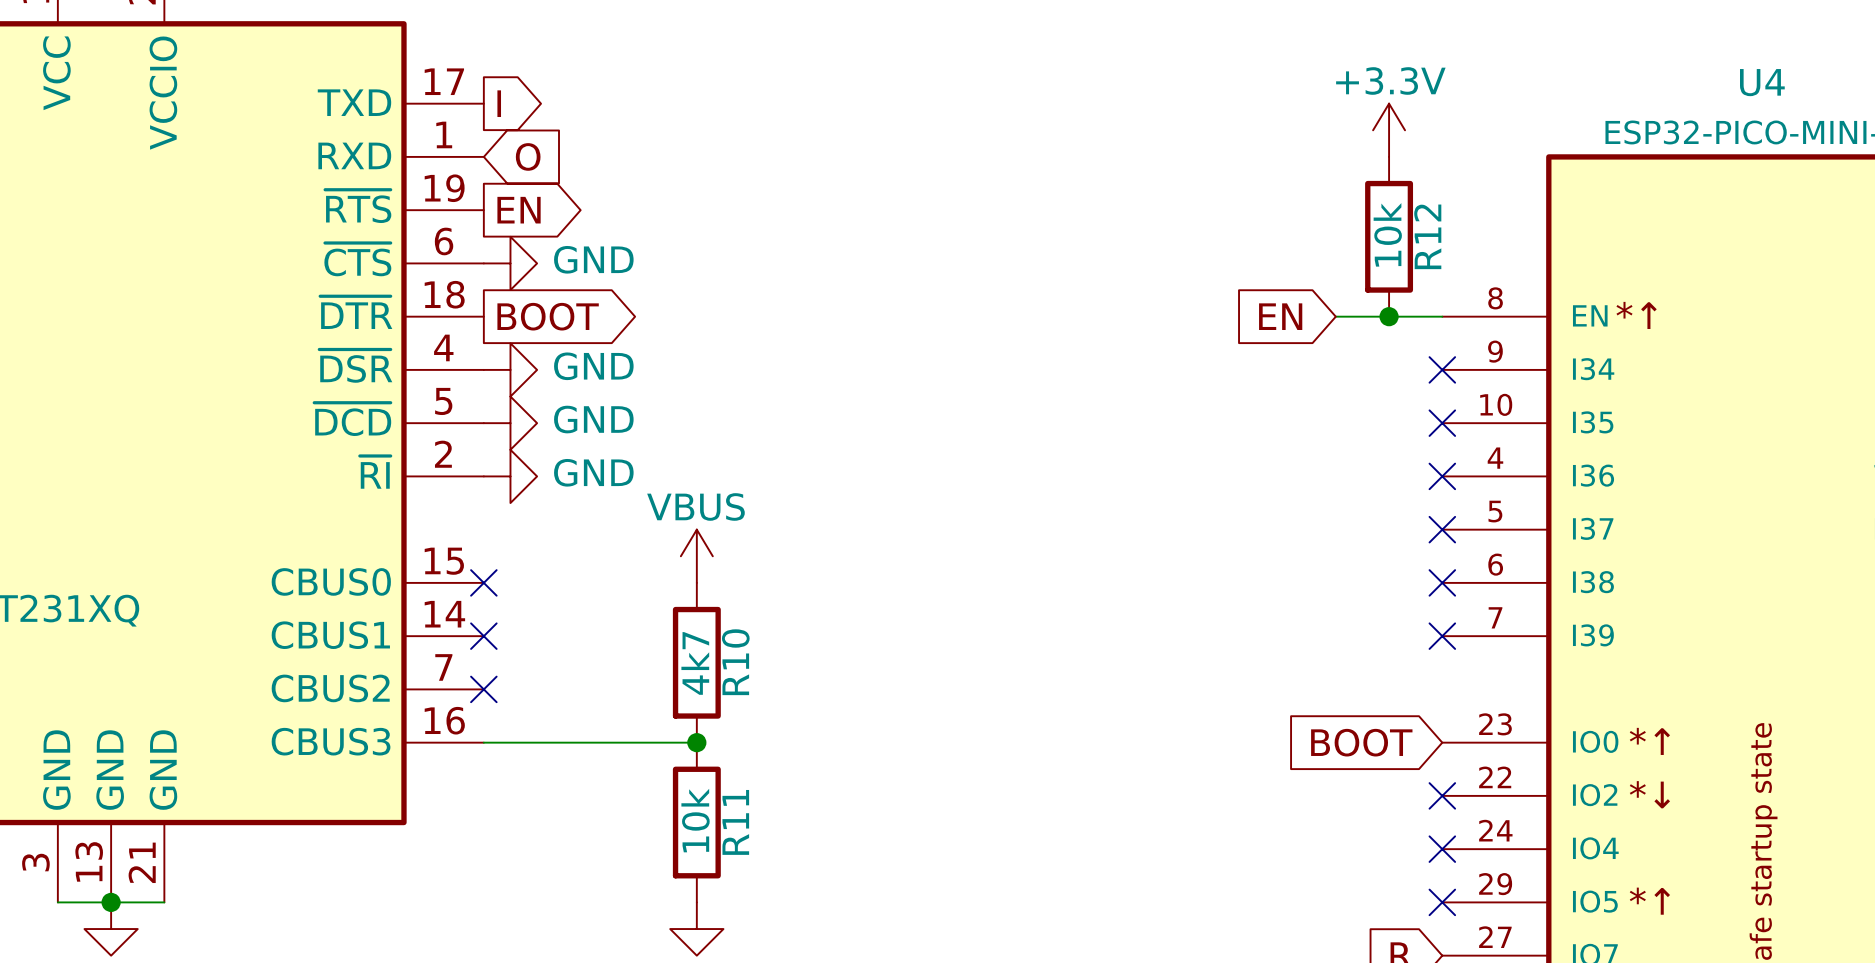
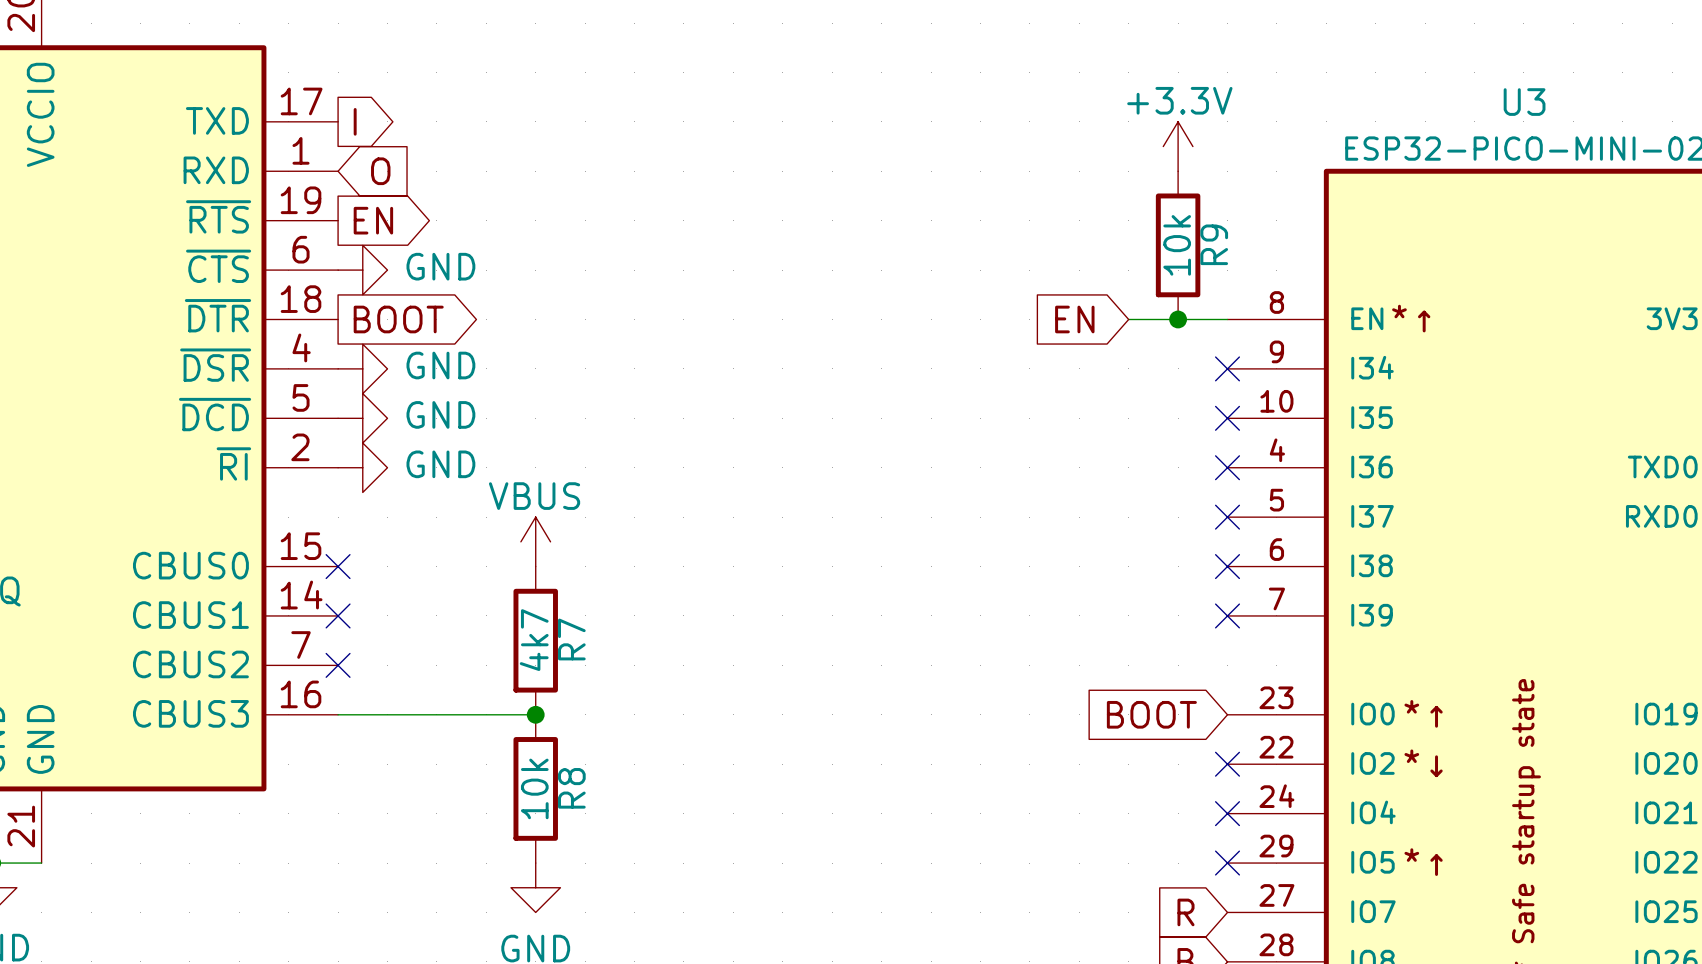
U4 name: U4 (1762, 82) -> U3 (1524, 102)
R12 name: R12 (1427, 236) -> R9 (1214, 244)
R10 name: R10 (735, 662) -> R7 (571, 639)
R11 name: R11 (735, 822) -> R8 (571, 788)

